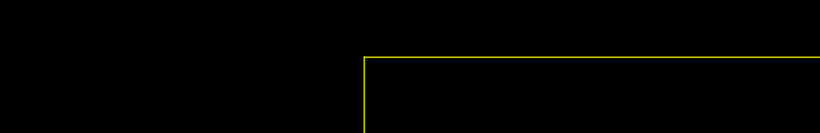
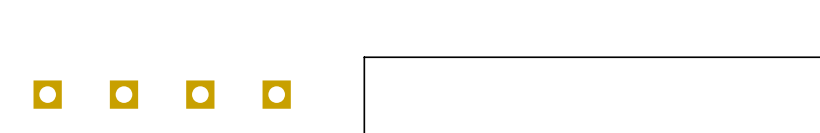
part: none -> (47, 94)
part: none -> (123, 94)
part: none -> (200, 94)
part: none -> (276, 94)

